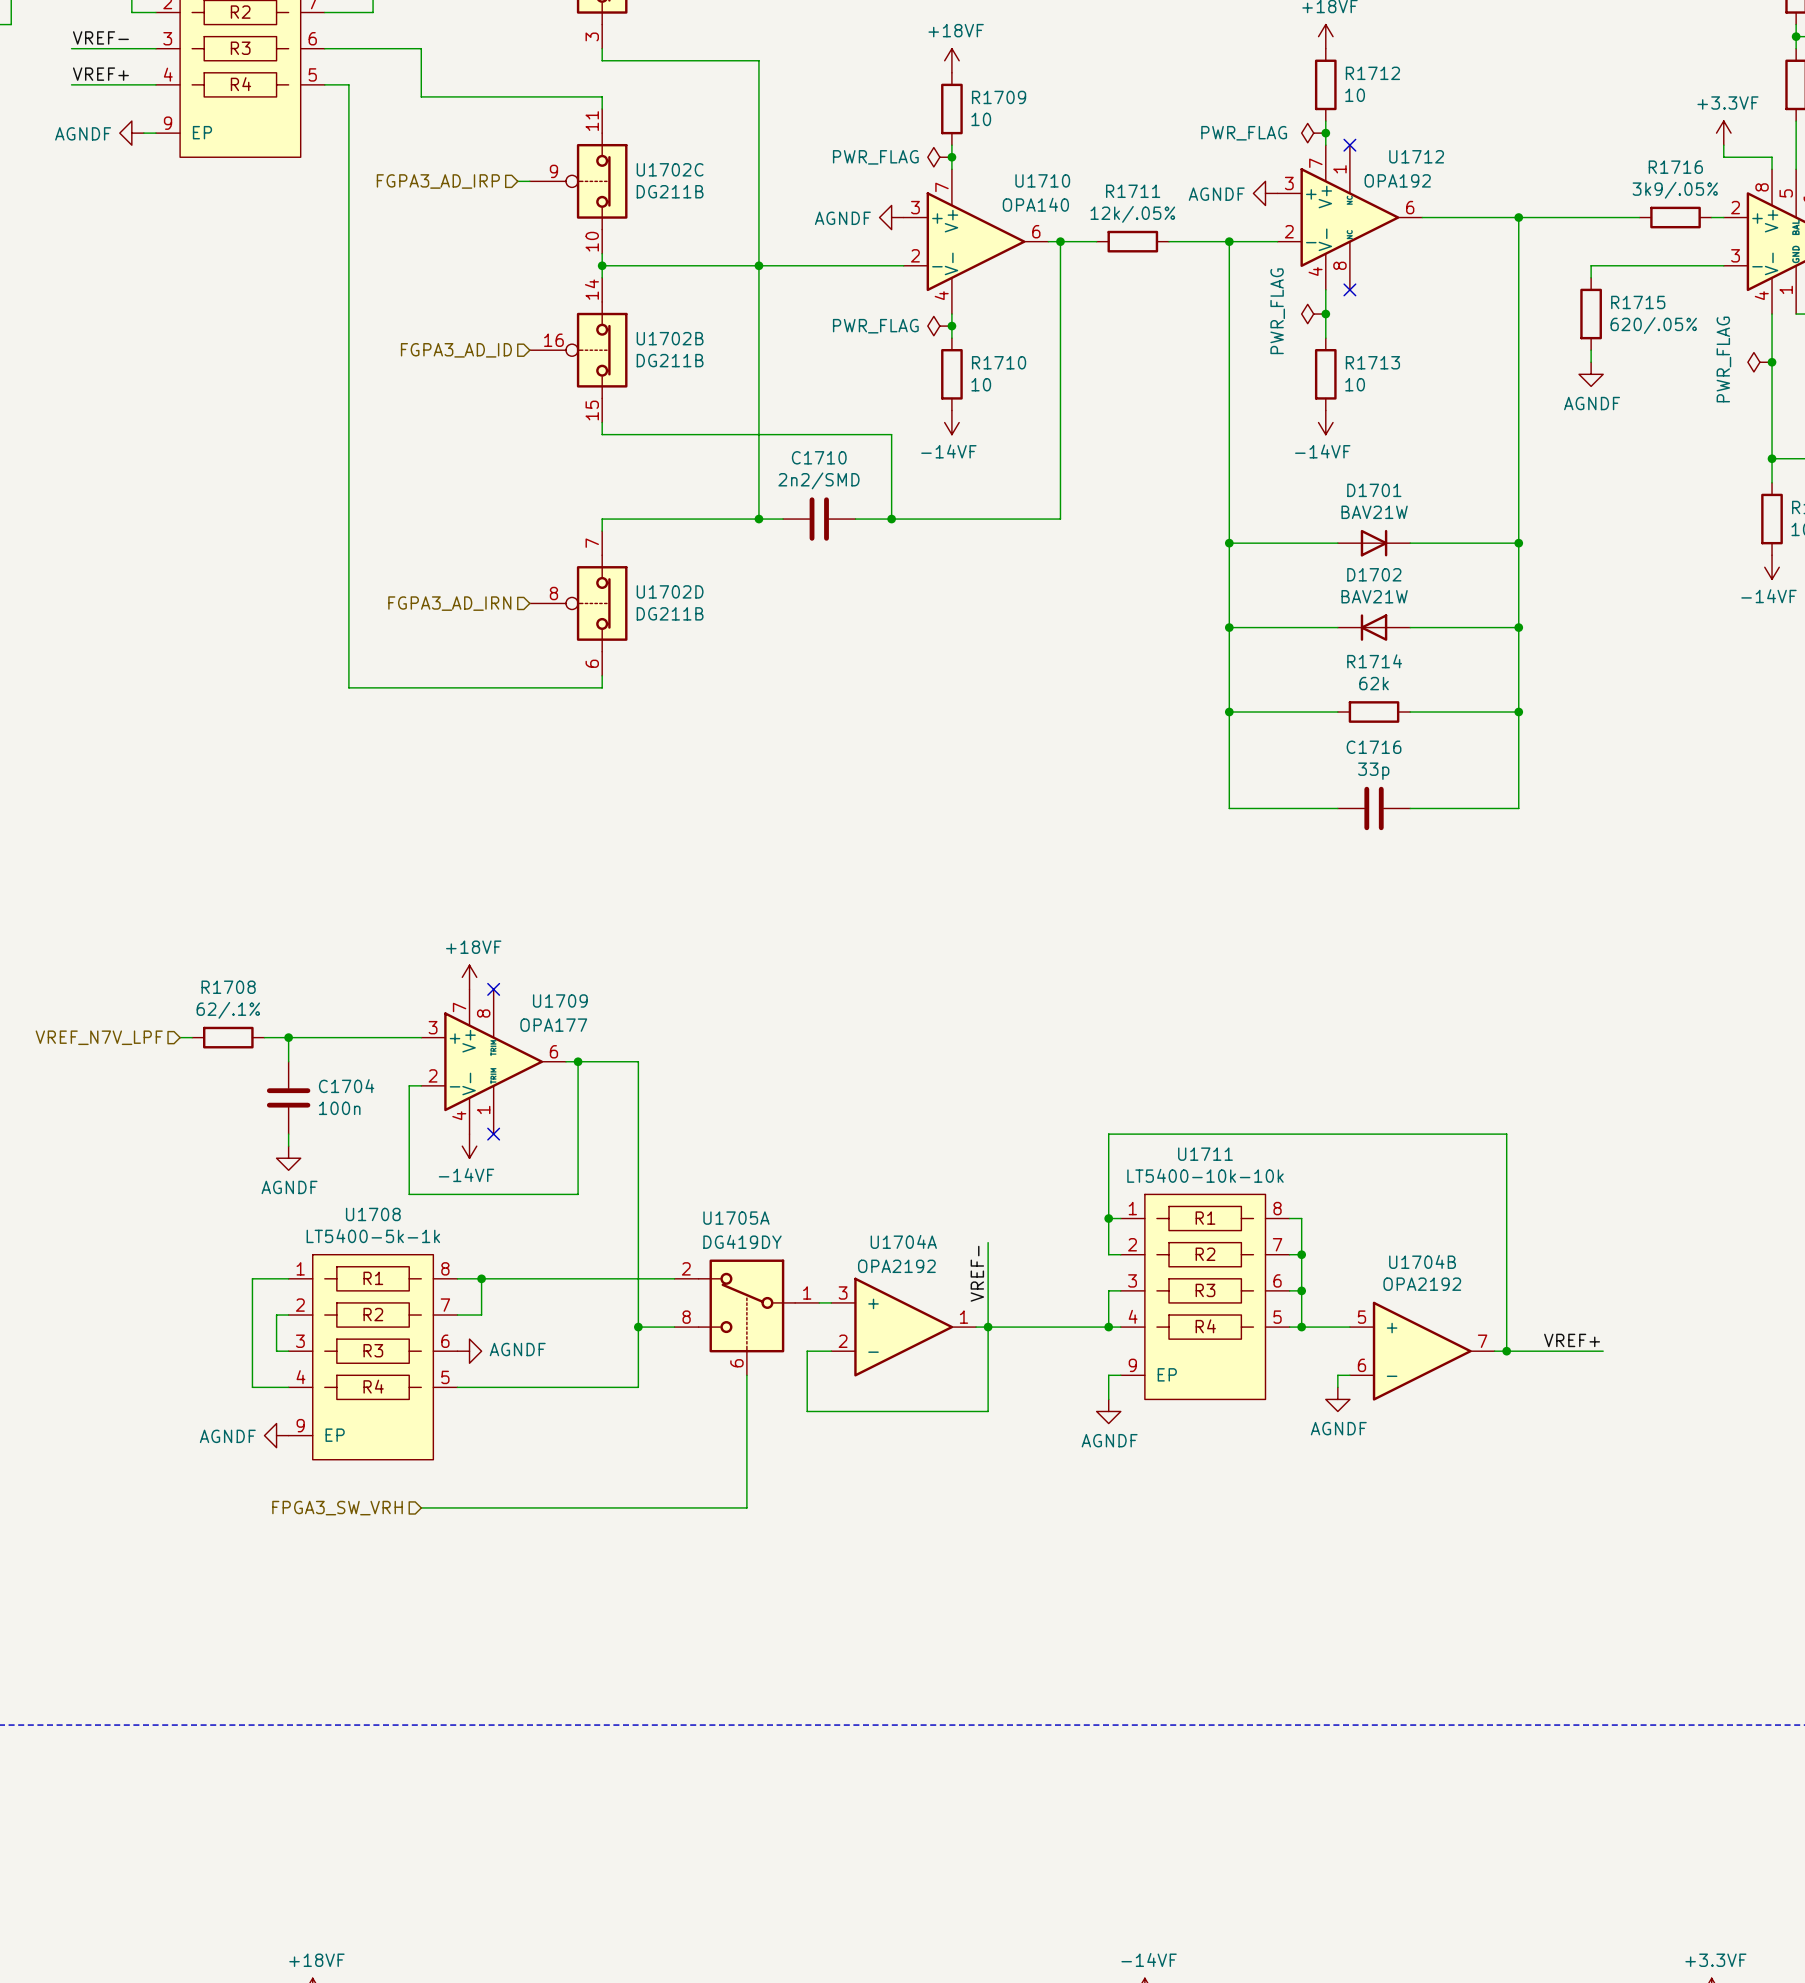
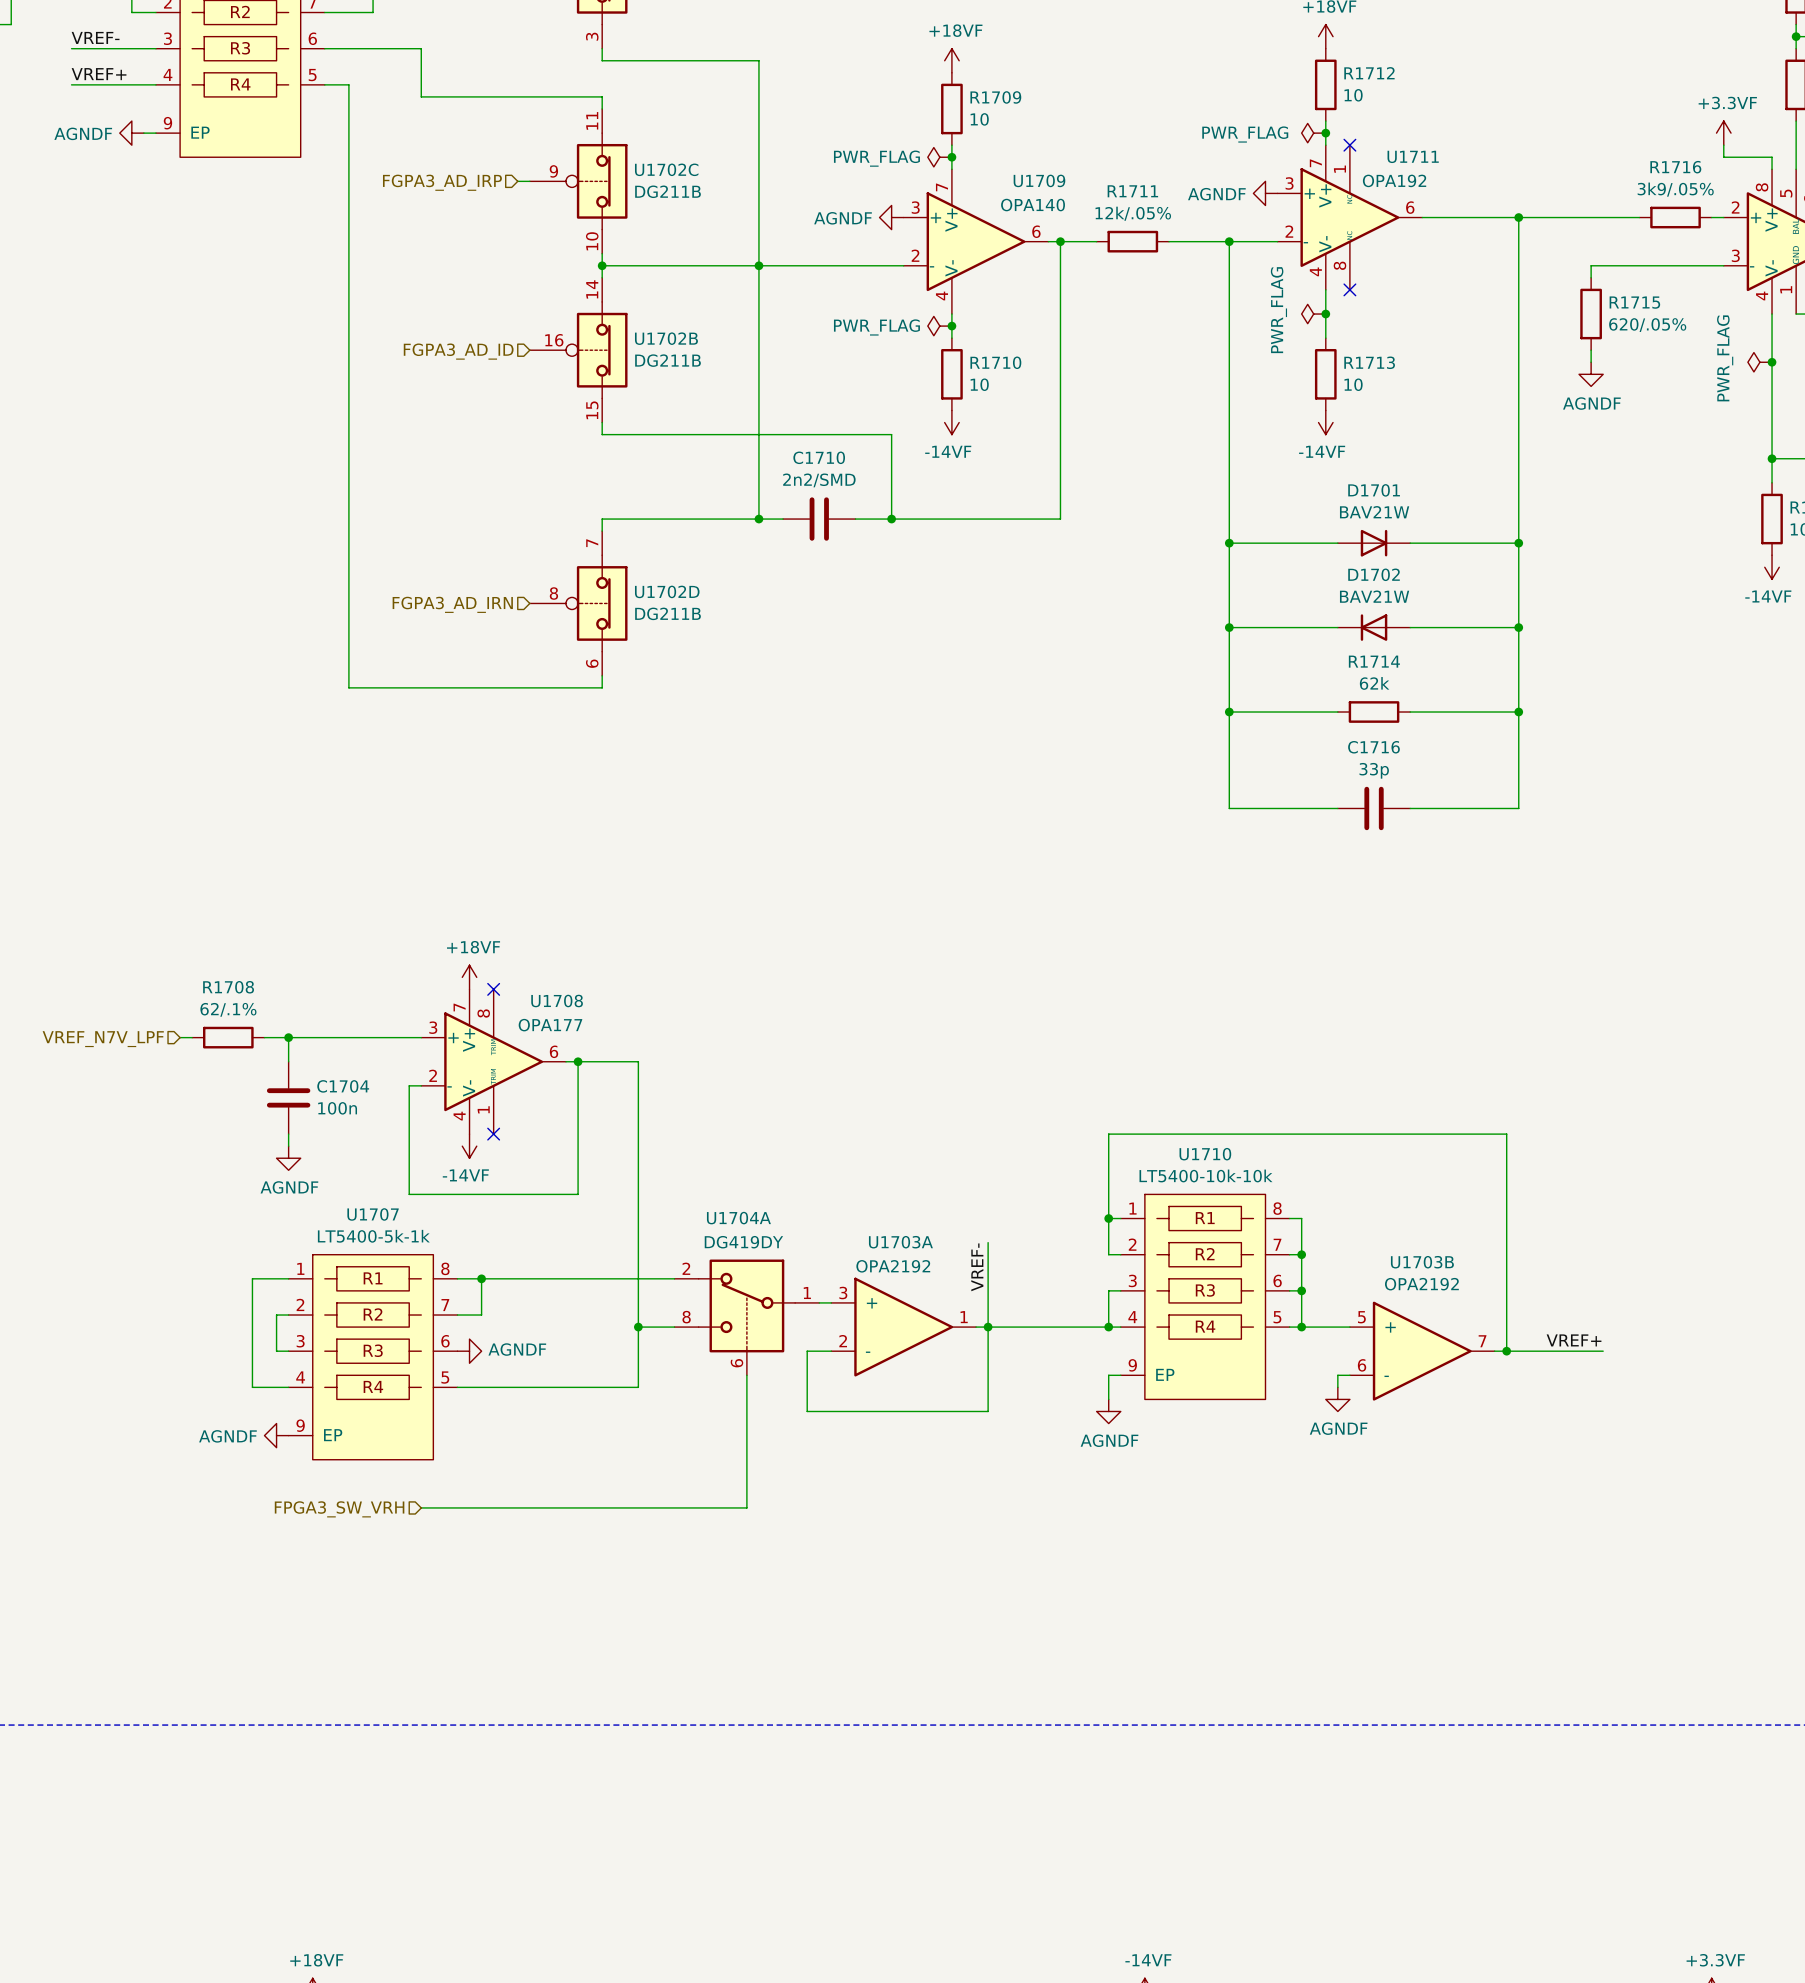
U1712 name: U1712 (1416, 156) -> U1711 (1413, 156)
U1710 name: U1710 (1042, 180) -> U1709 (1039, 180)
U1709 name: U1709 (560, 1000) -> U1708 (557, 1001)
U1711 name: U1711 (1205, 1154) -> U1710 (1205, 1154)
U1708 name: U1708 (373, 1214) -> U1707 (373, 1214)
U1705A name: U1705A (736, 1218) -> U1704A (738, 1218)
U1704A name: U1704A (903, 1241) -> U1703A (900, 1242)
U1704B name: U1704B (1422, 1261) -> U1703B (1422, 1262)

